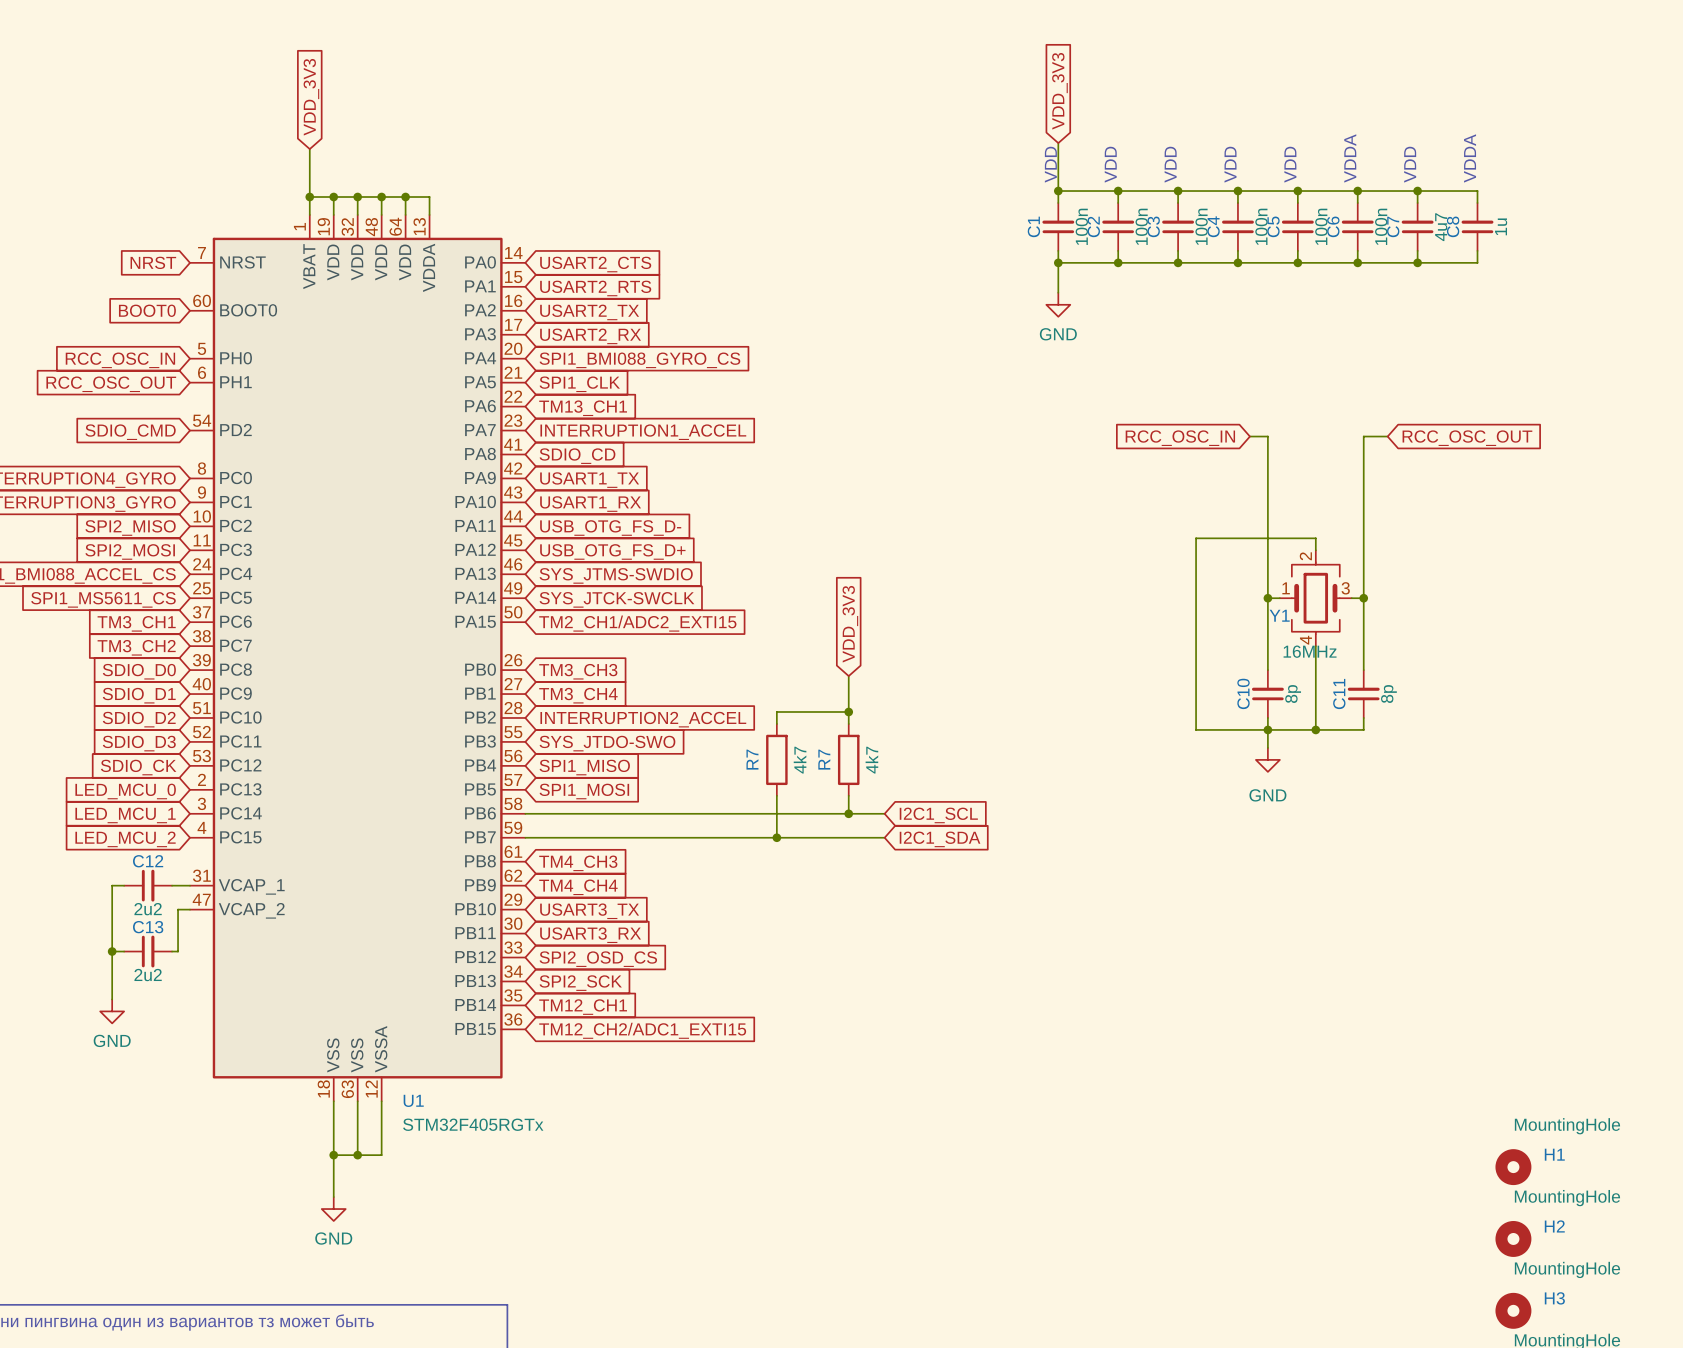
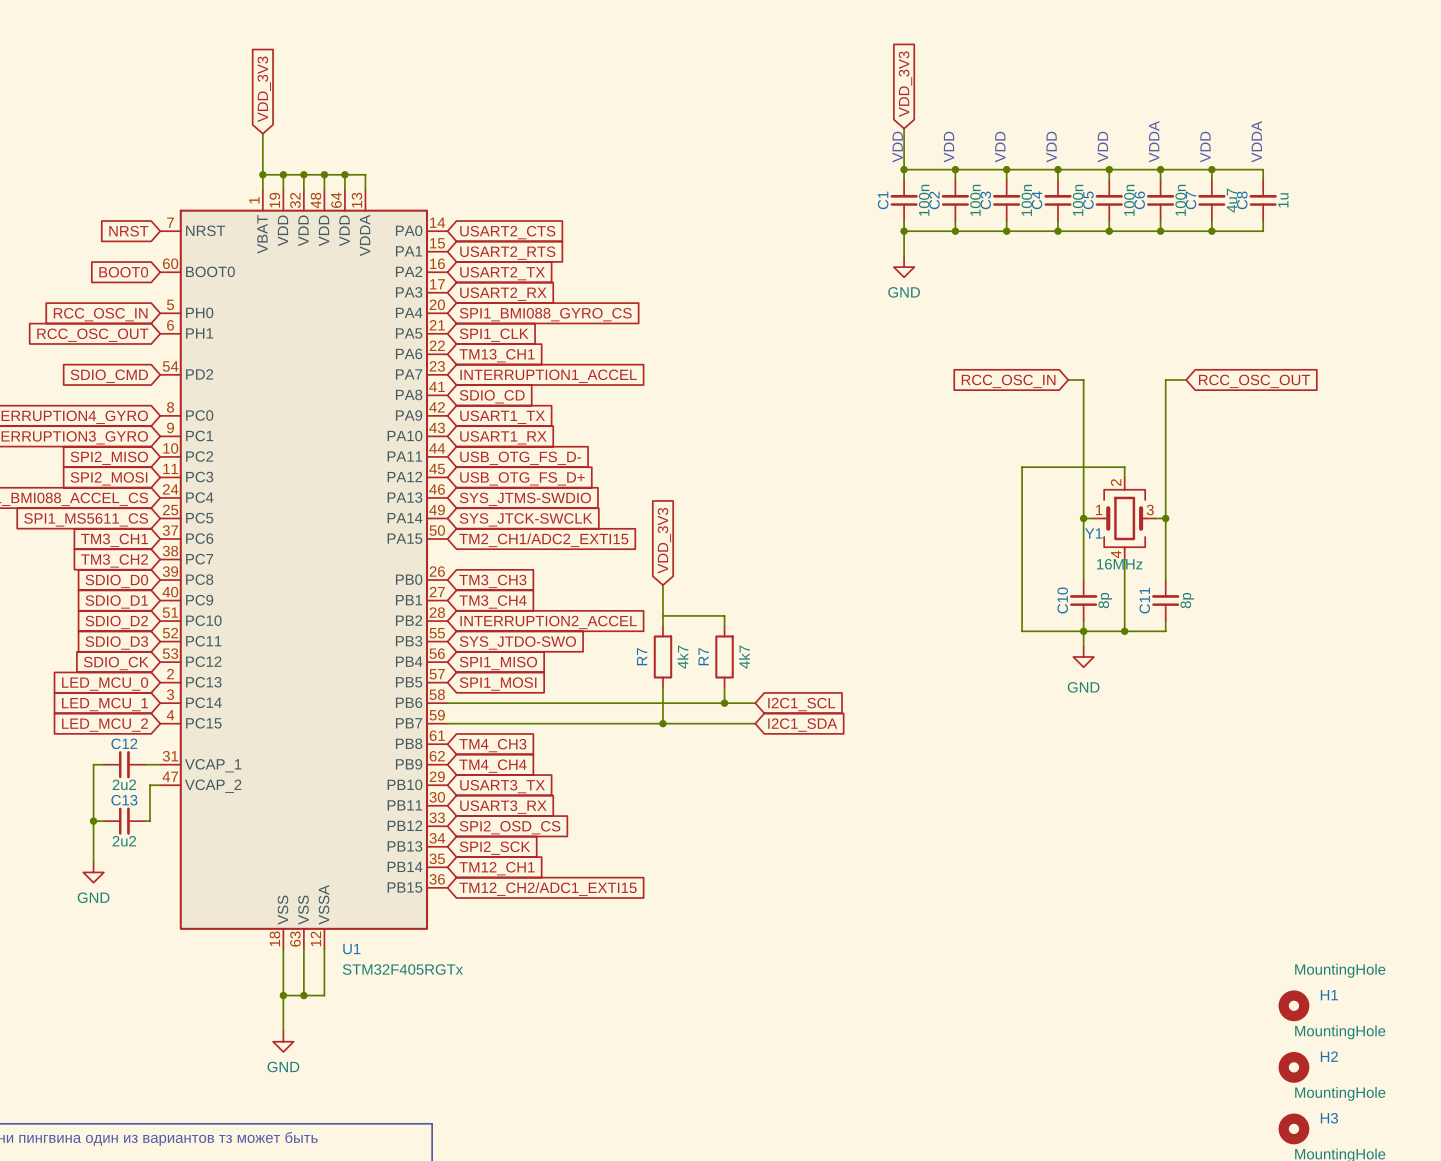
global label position: VDD_3V3 (850, 624) -> VDD_3V3 (664, 540)
wire: (848, 676) (848, 711) -> (662, 585) (662, 615)
junction: (848, 711) -> none

